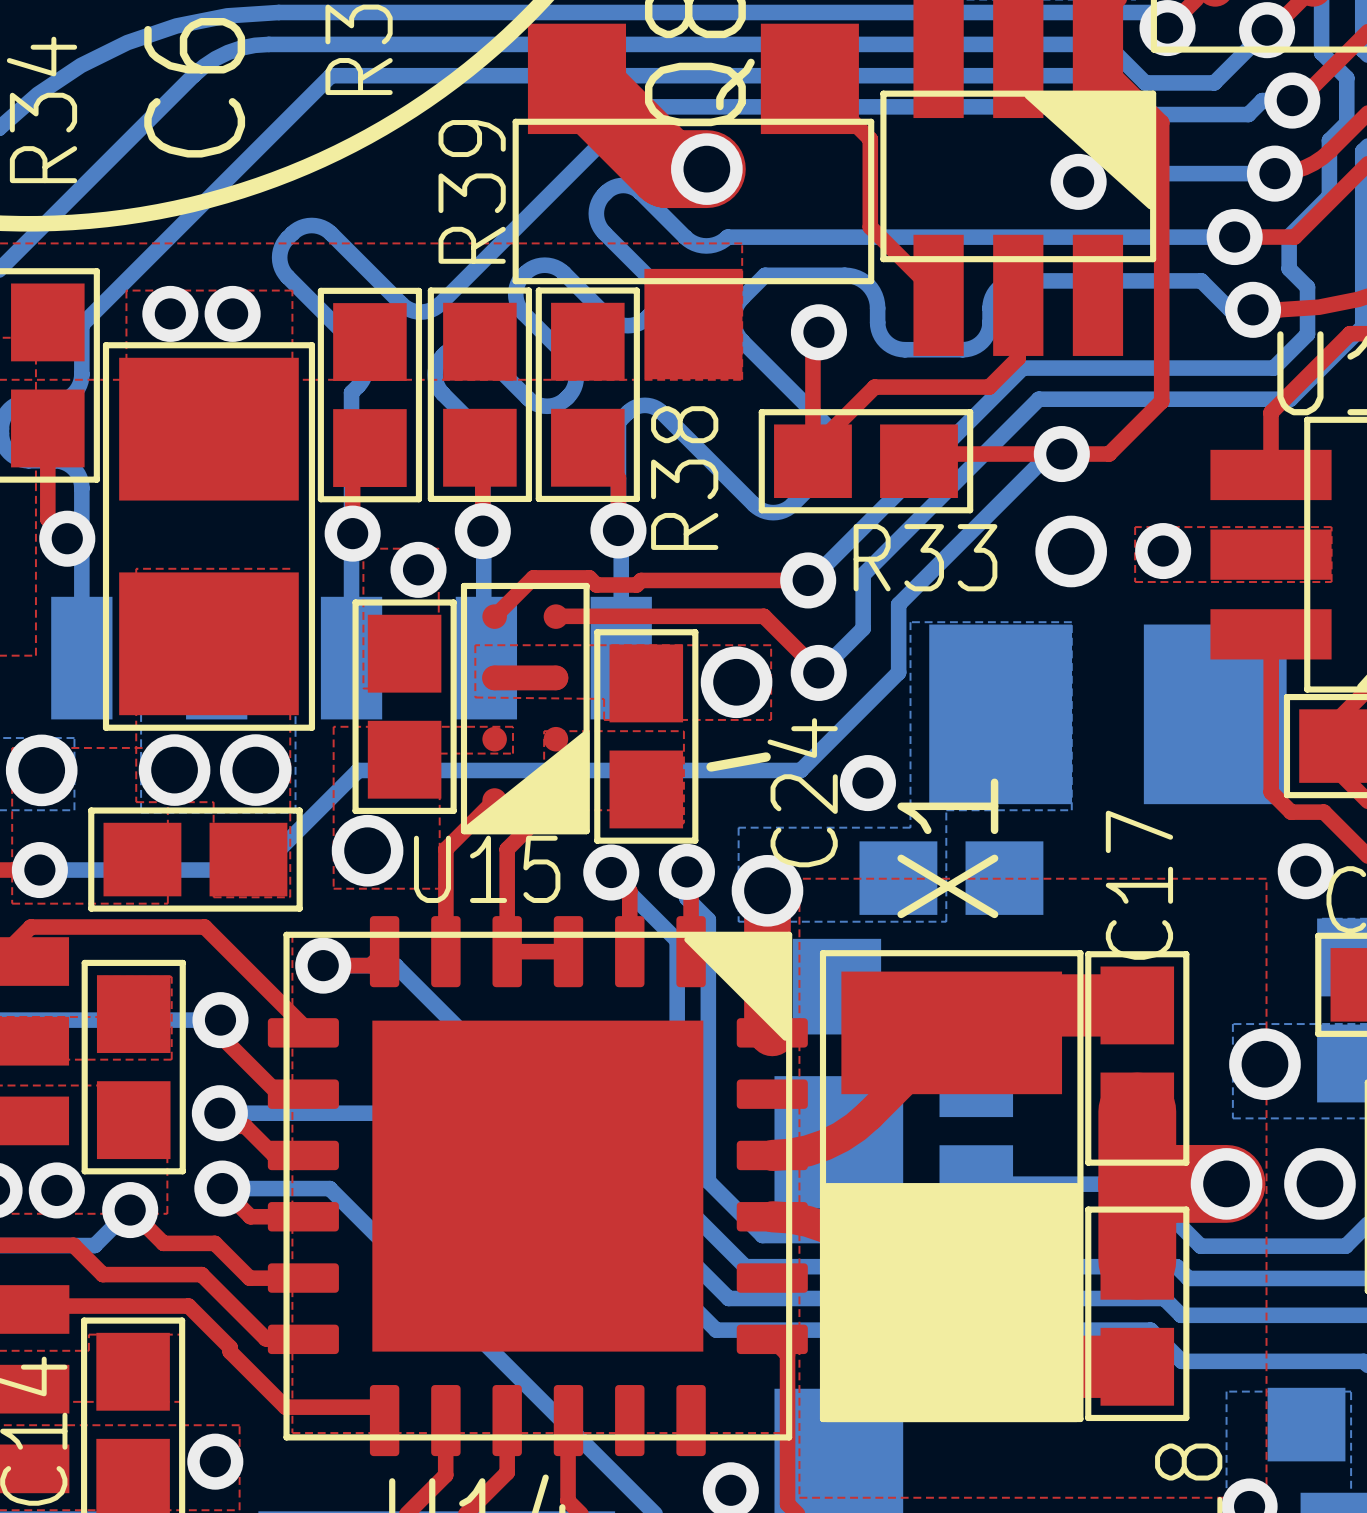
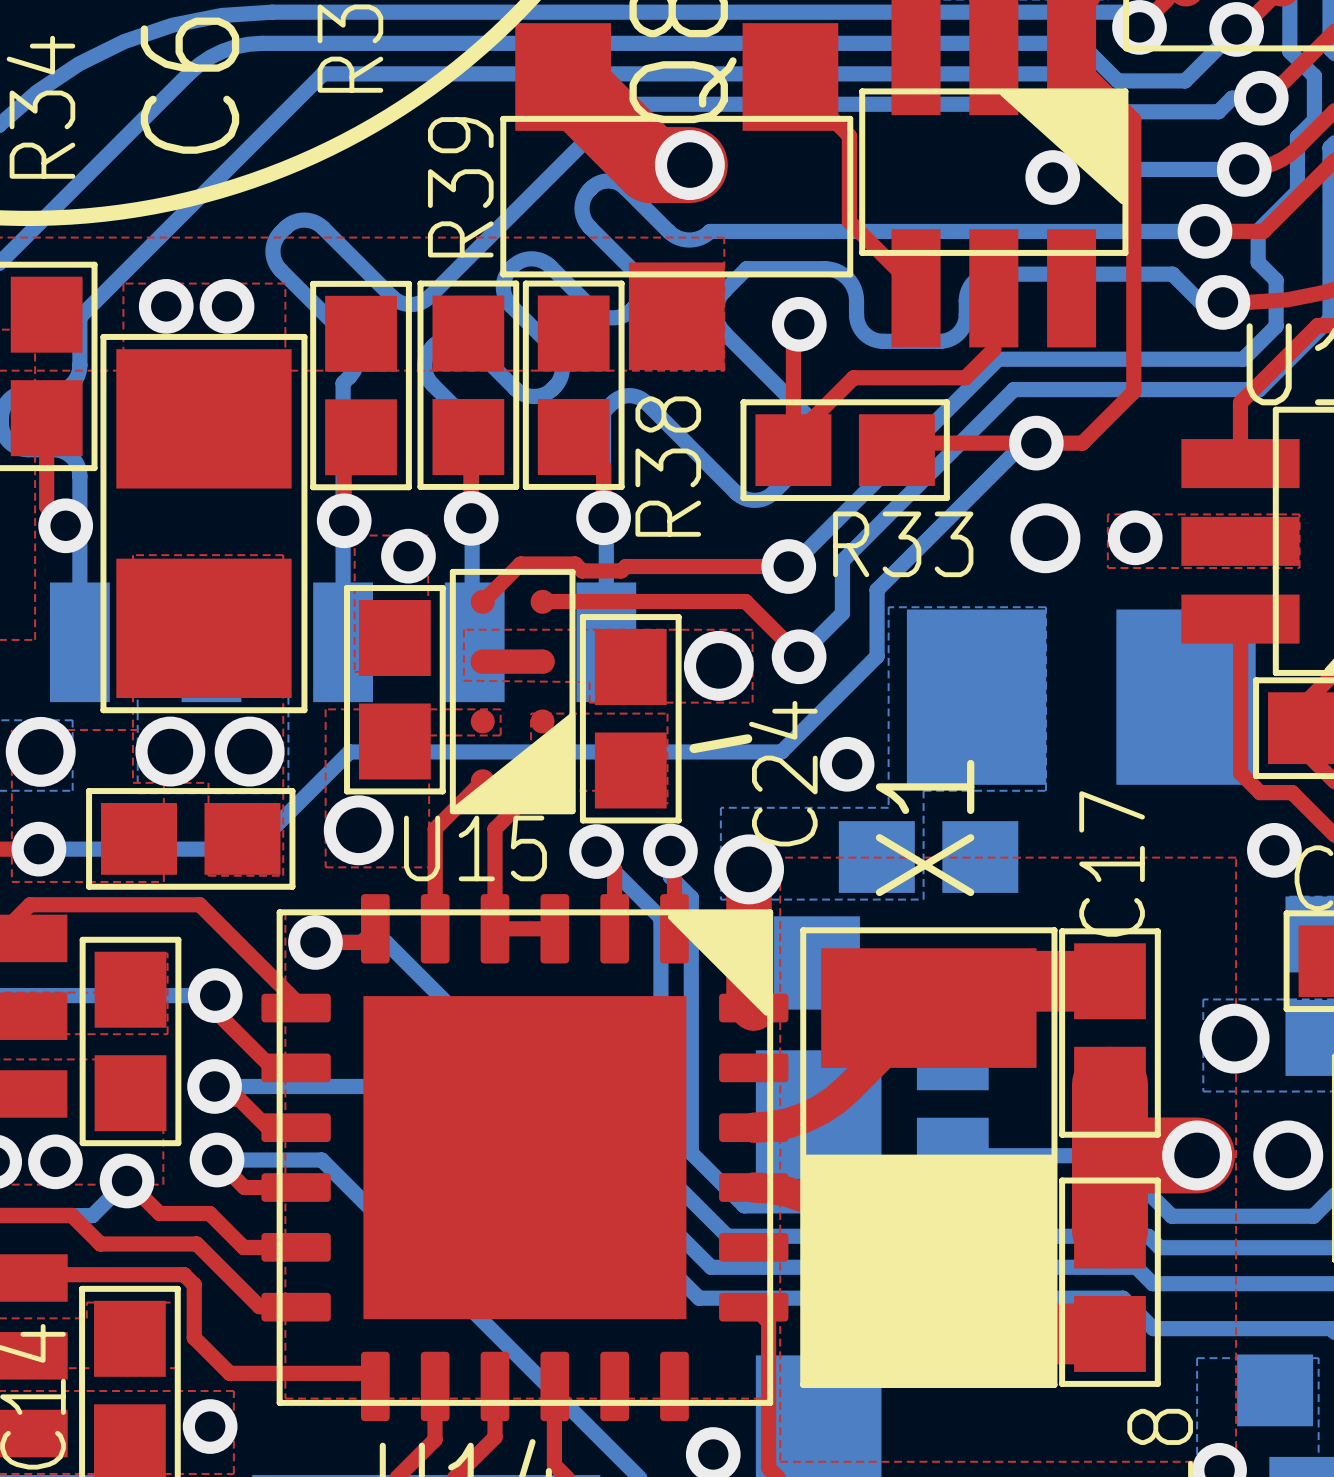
top track: (199, 1316) (230, 1347) (230, 1351) (285, 1407) -> (194, 1284) (194, 1337) (229, 1373) (278, 1373)

